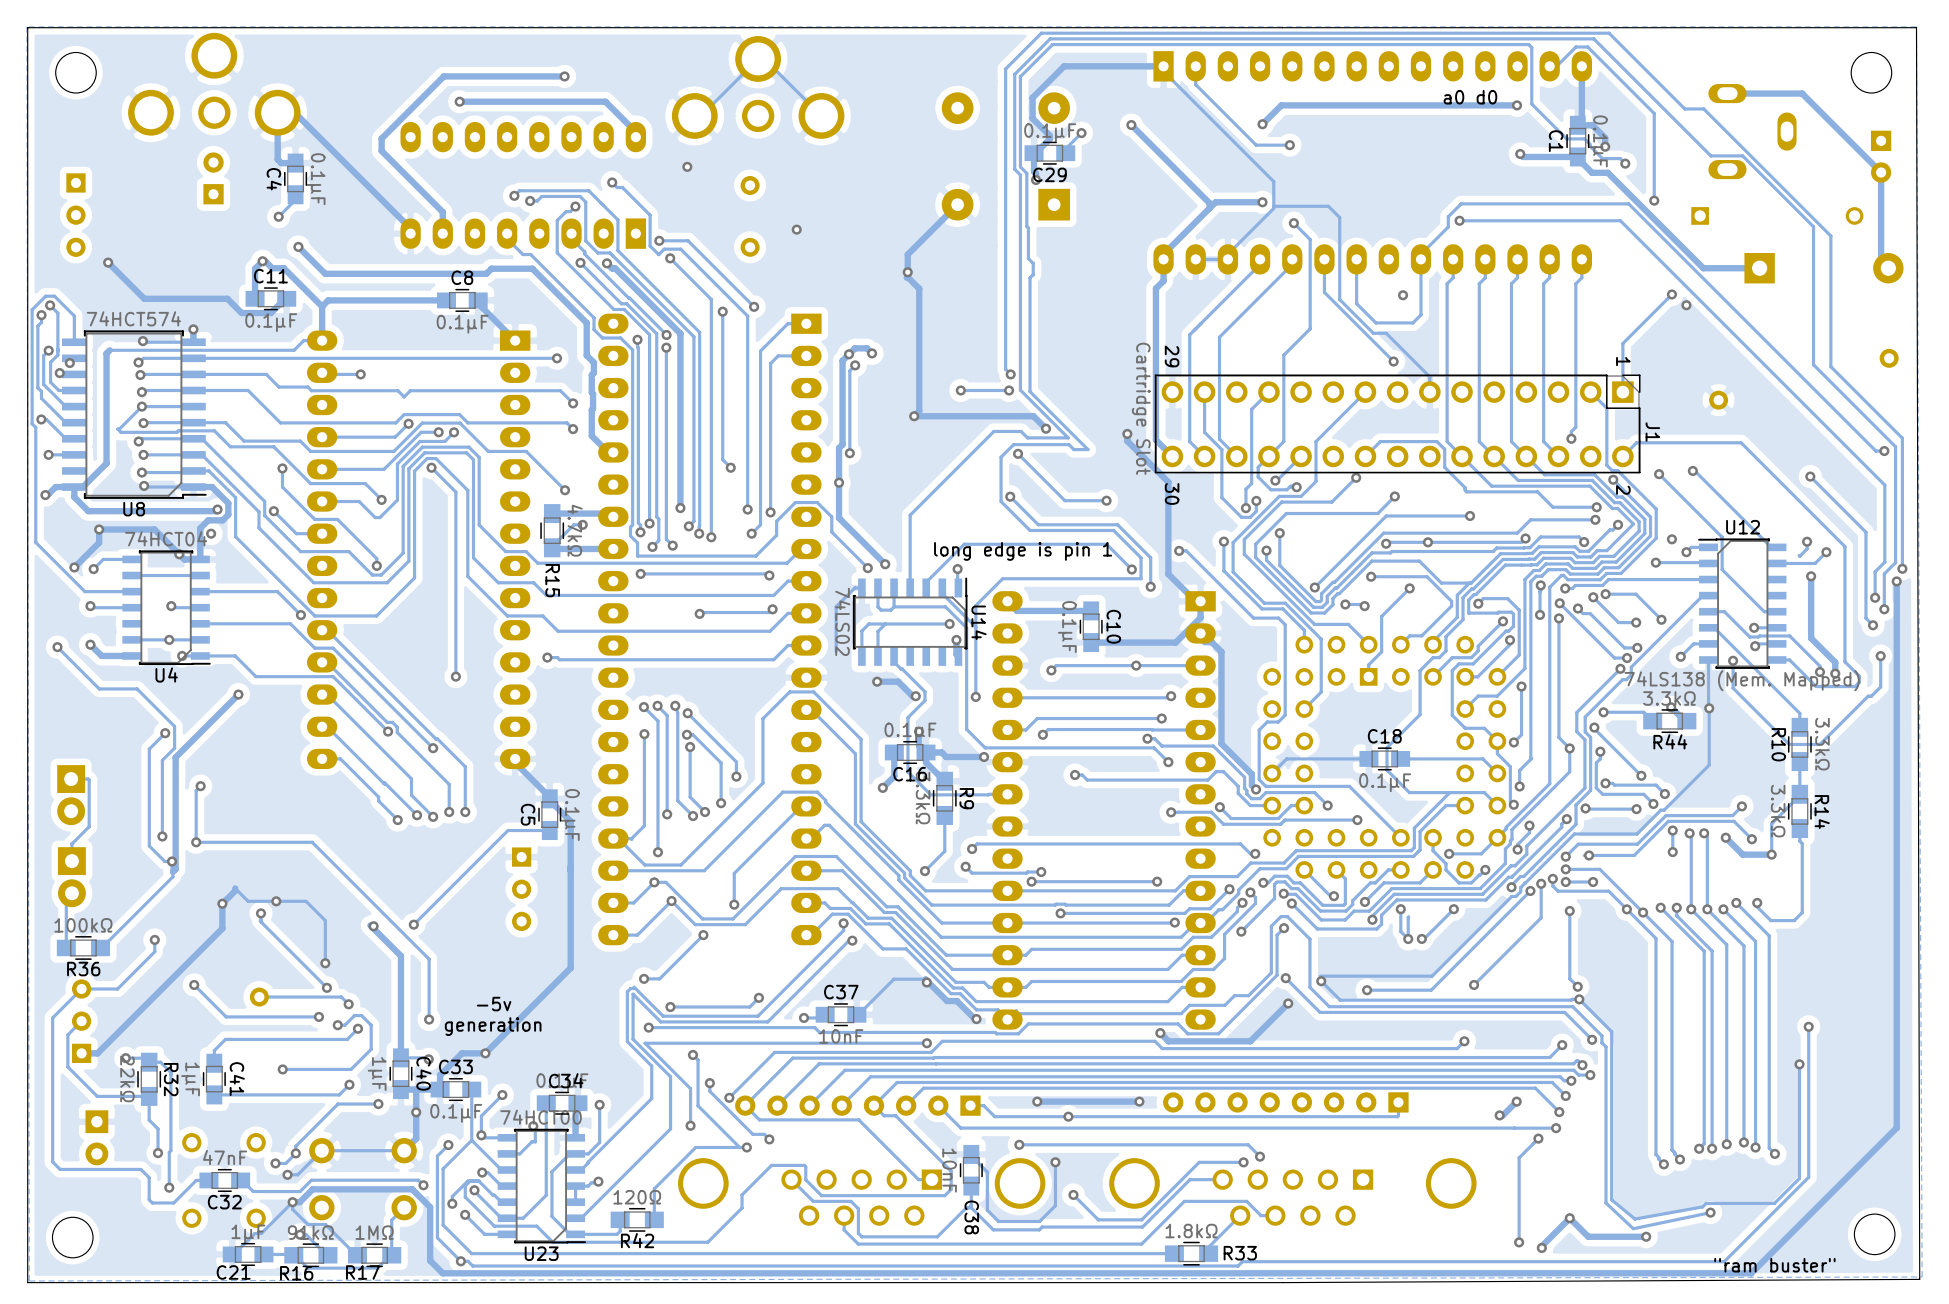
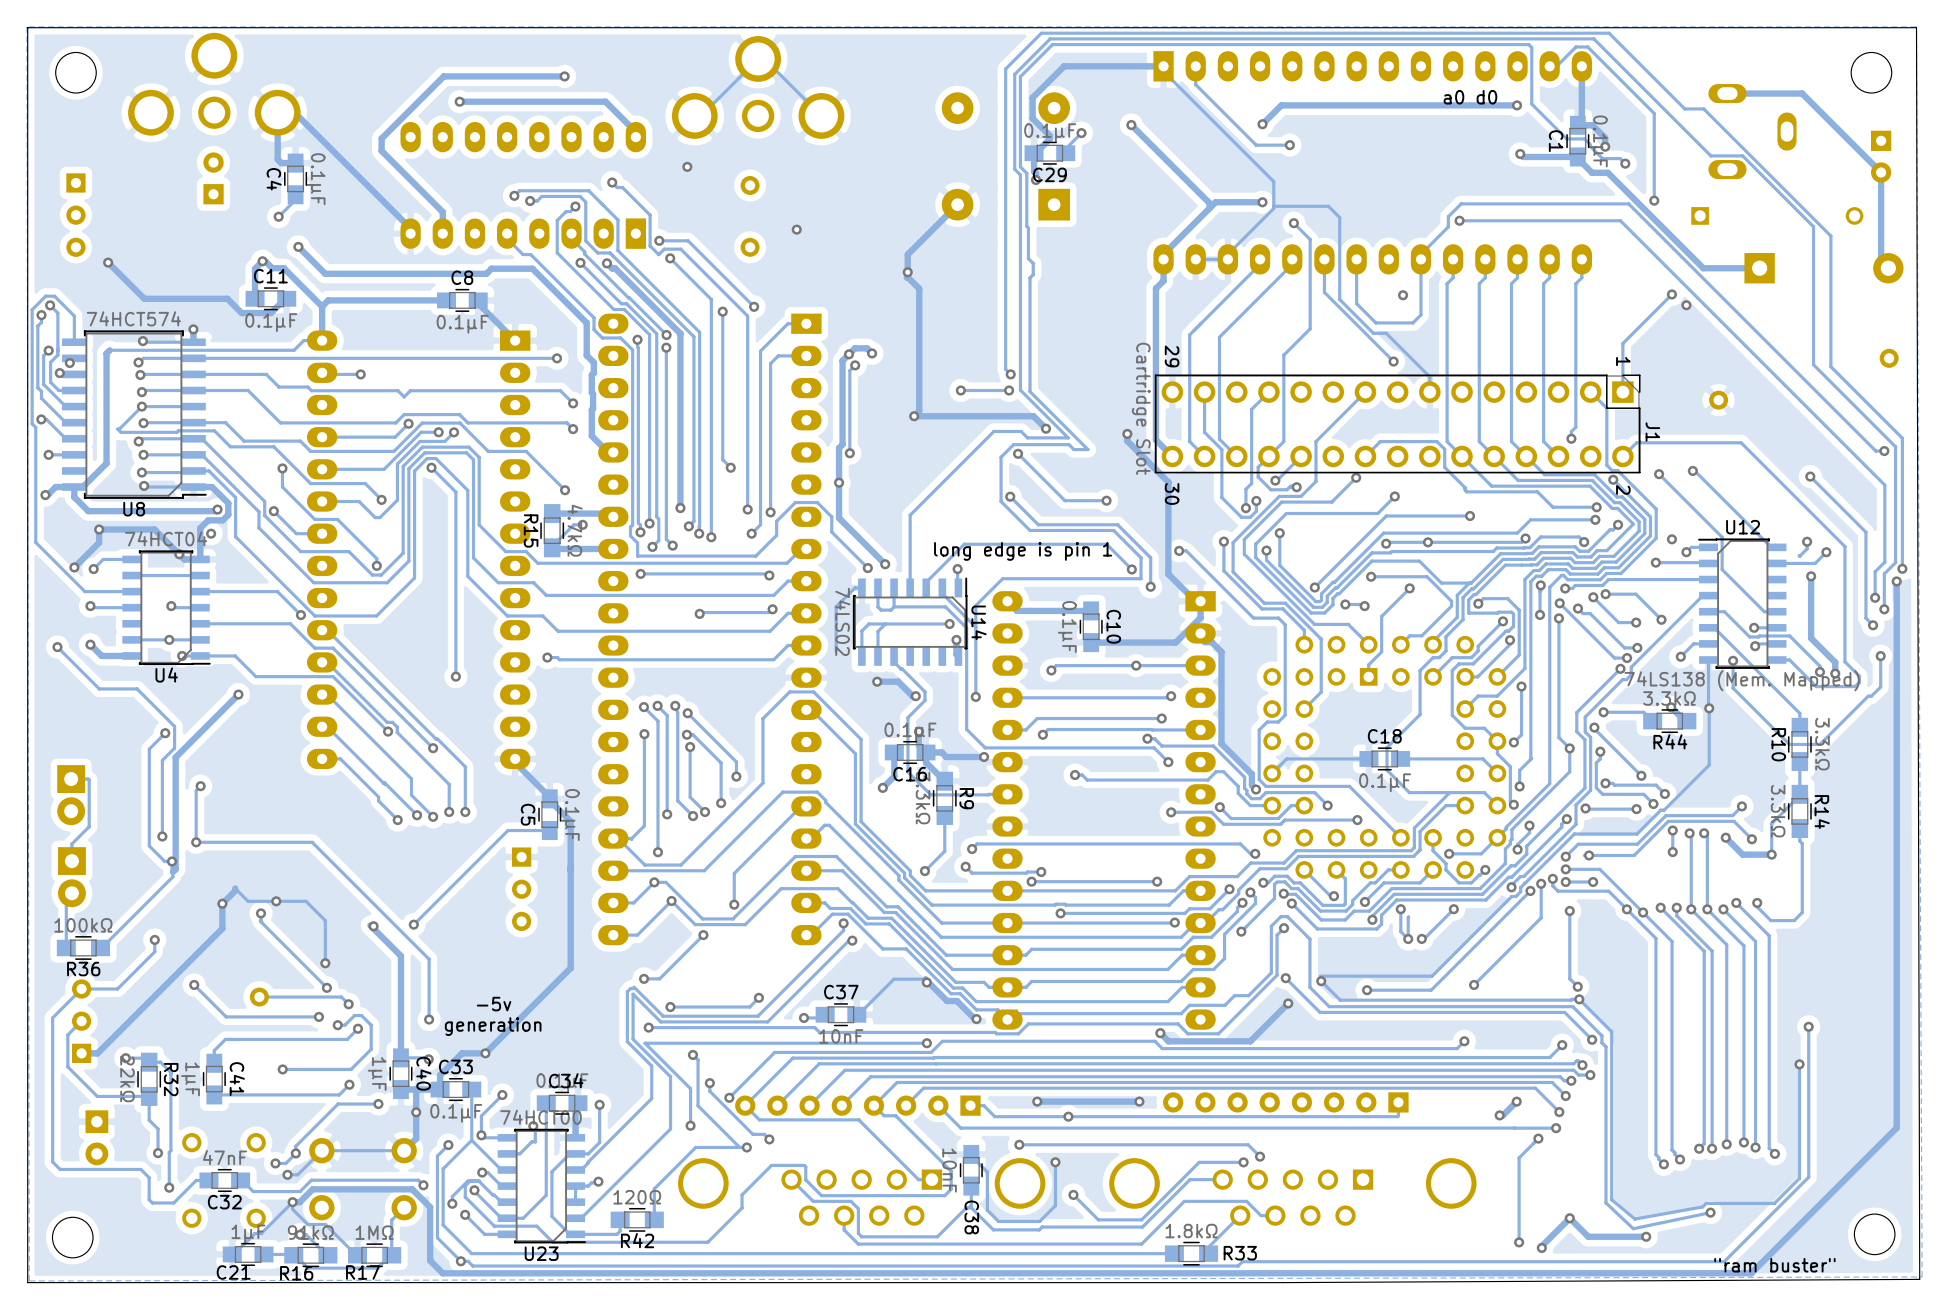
R15 name position: R15 (552, 580) -> R15 (531, 530)

